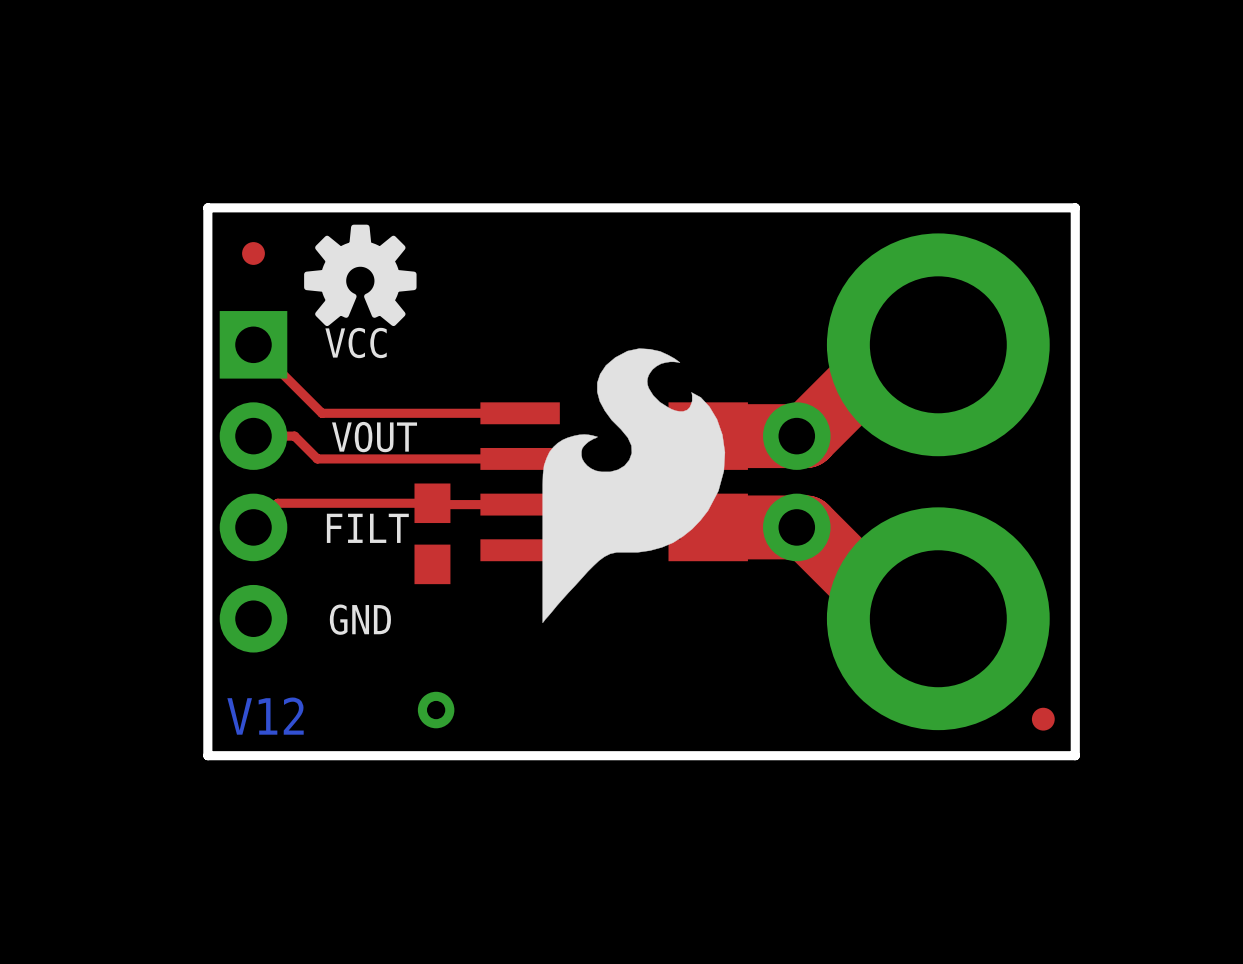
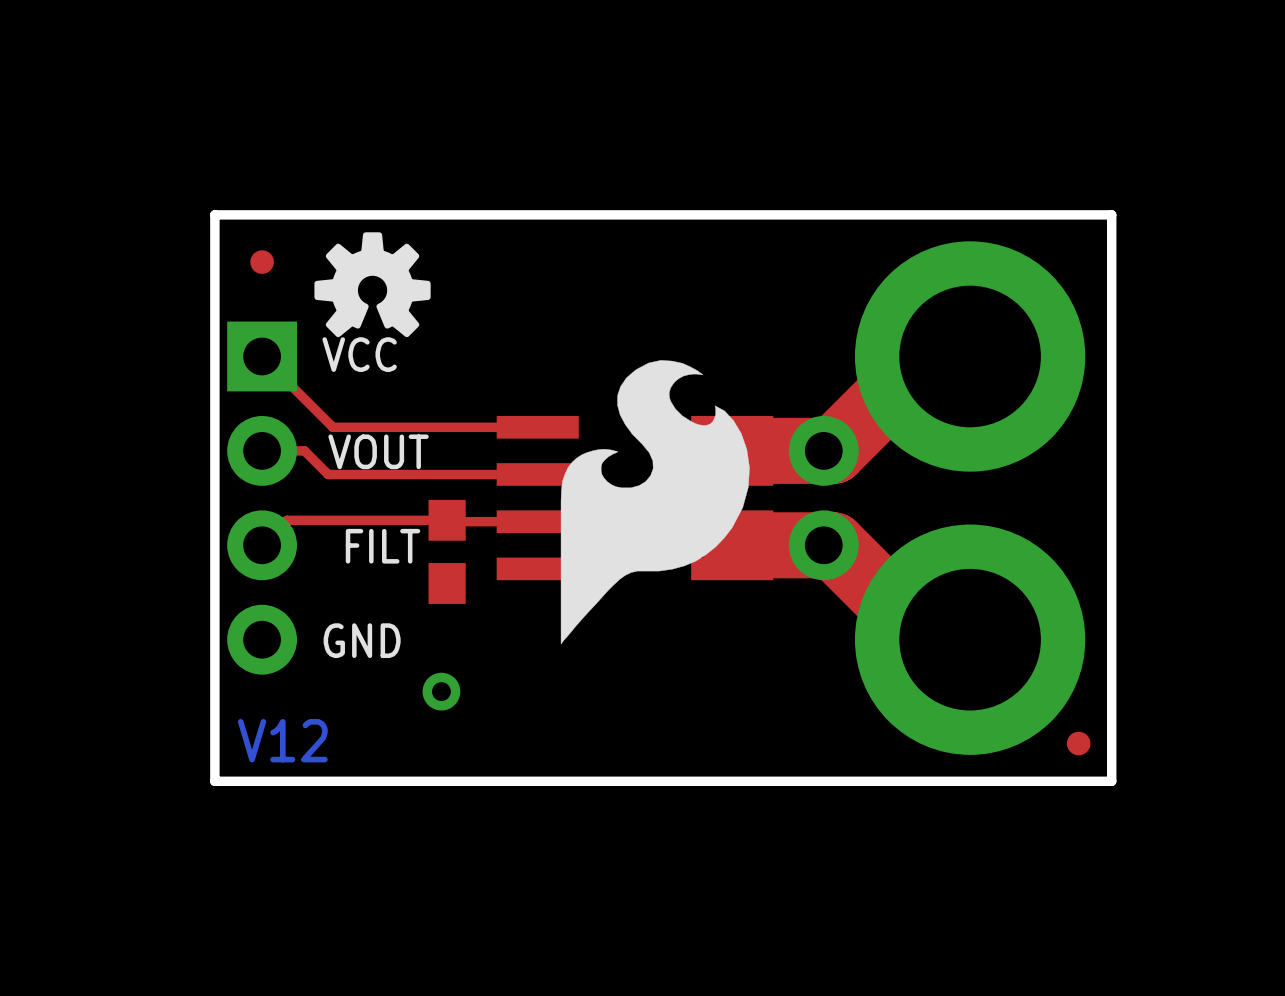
via position: (436, 710) -> (441, 691)

